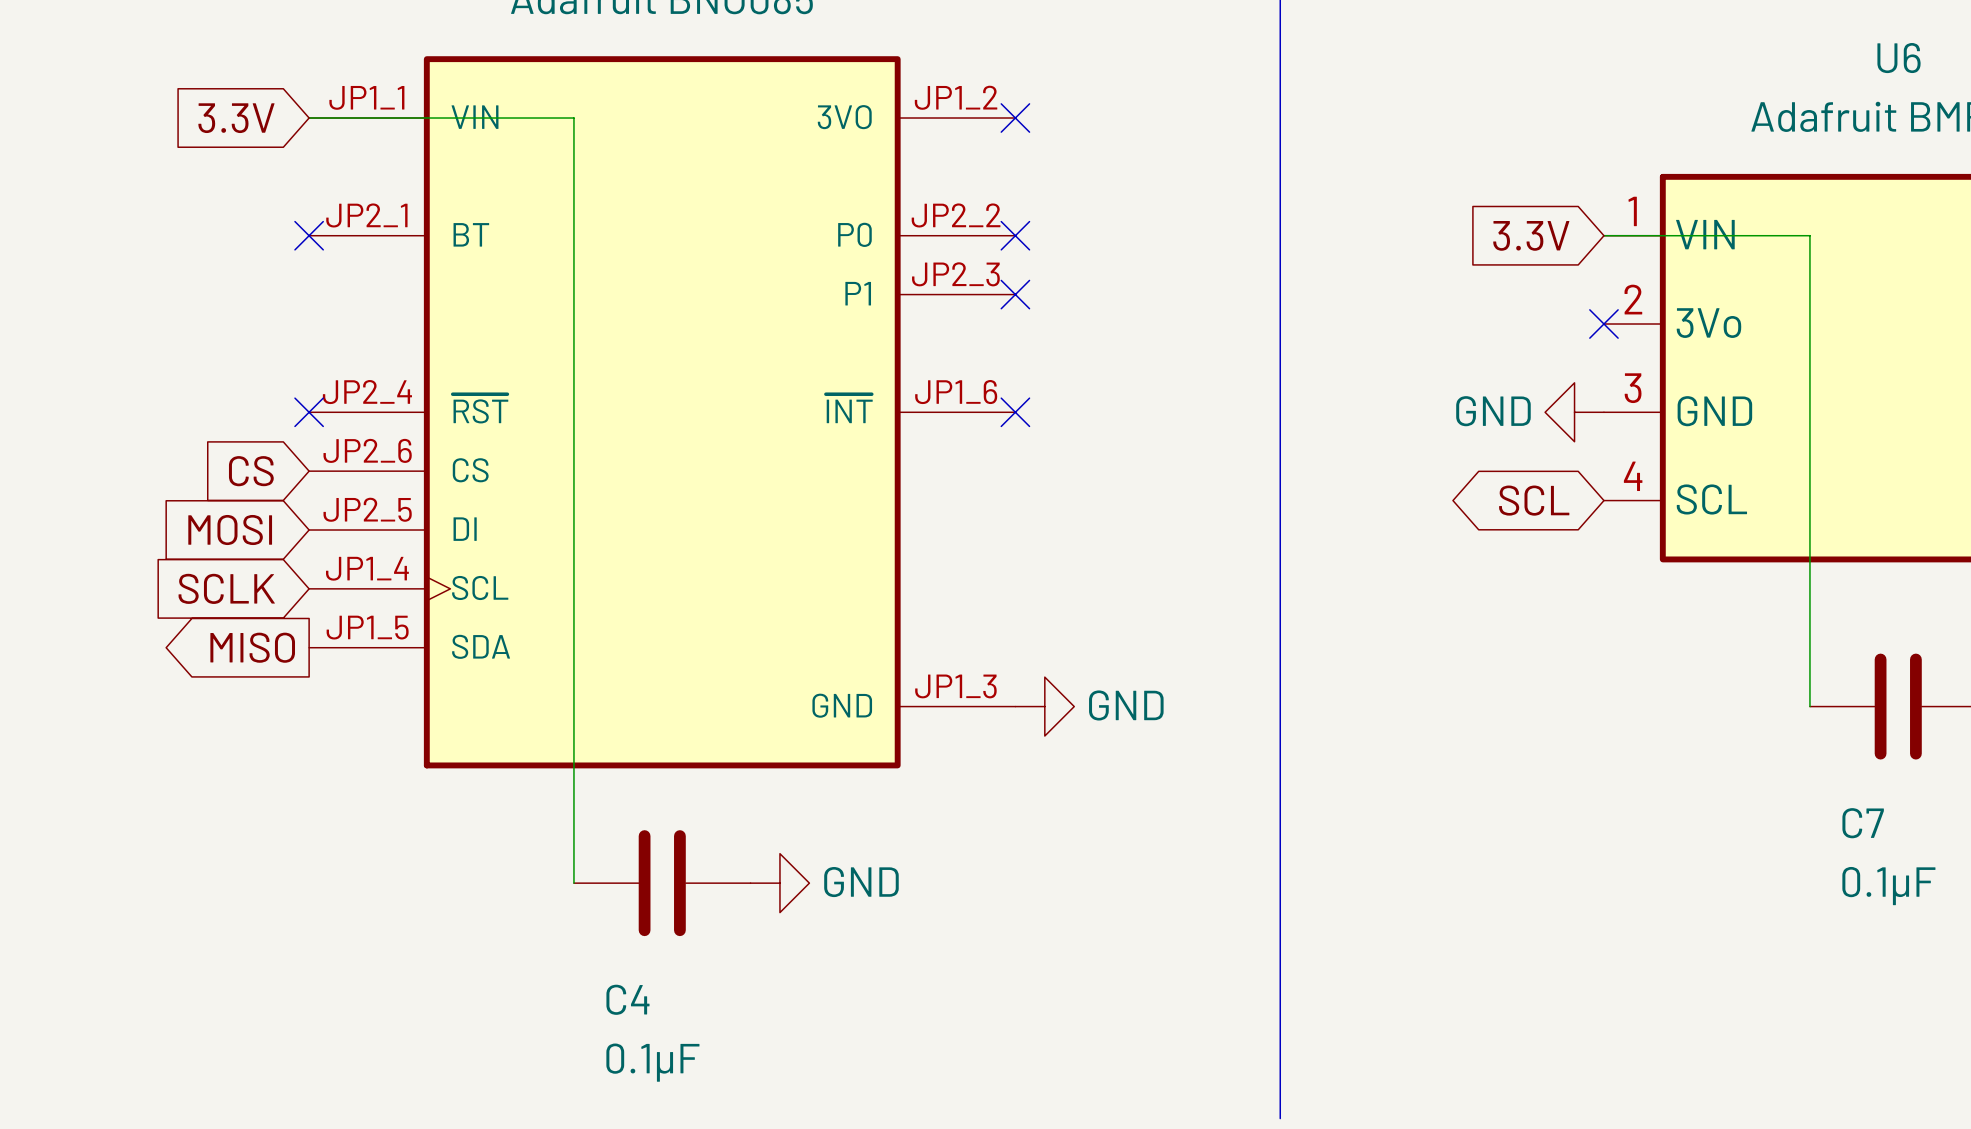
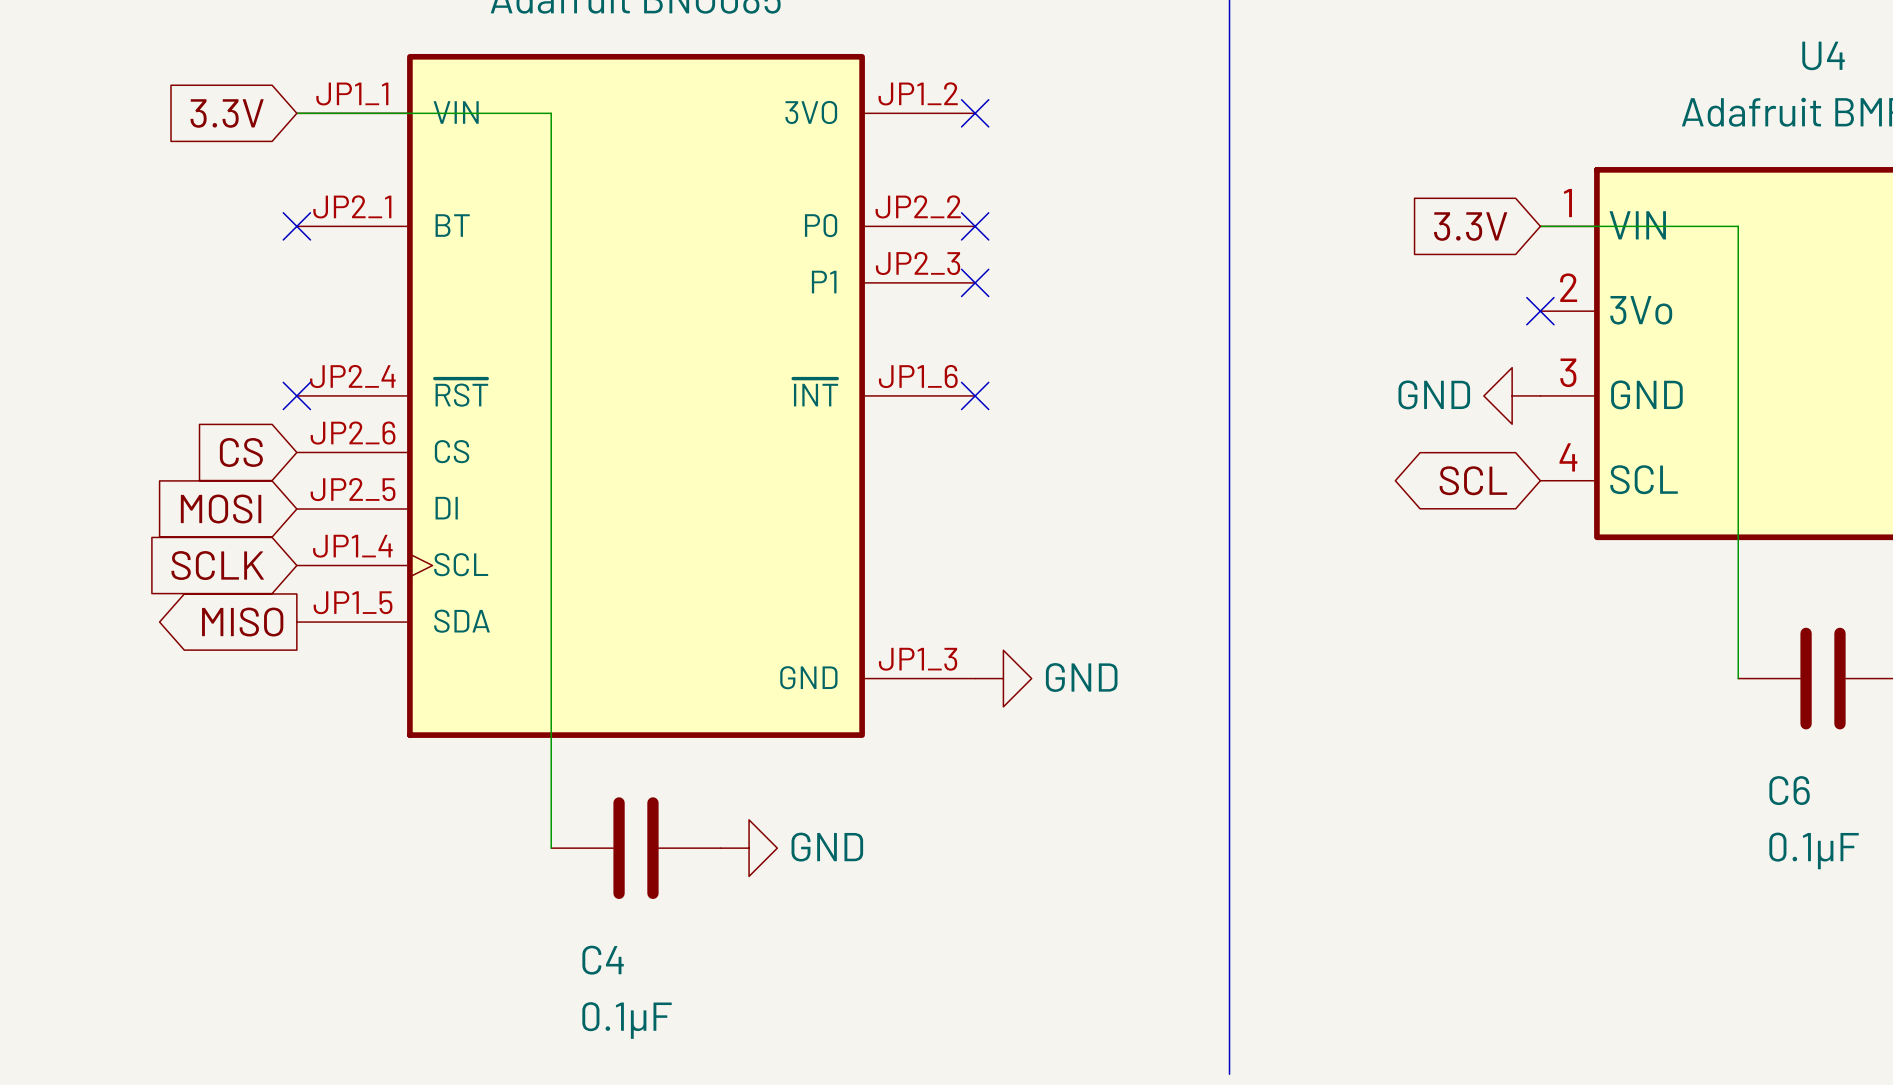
U6 name: U6 (1899, 58) -> U4 (1823, 55)
C7 name: C7 (1863, 823) -> C6 (1789, 790)

